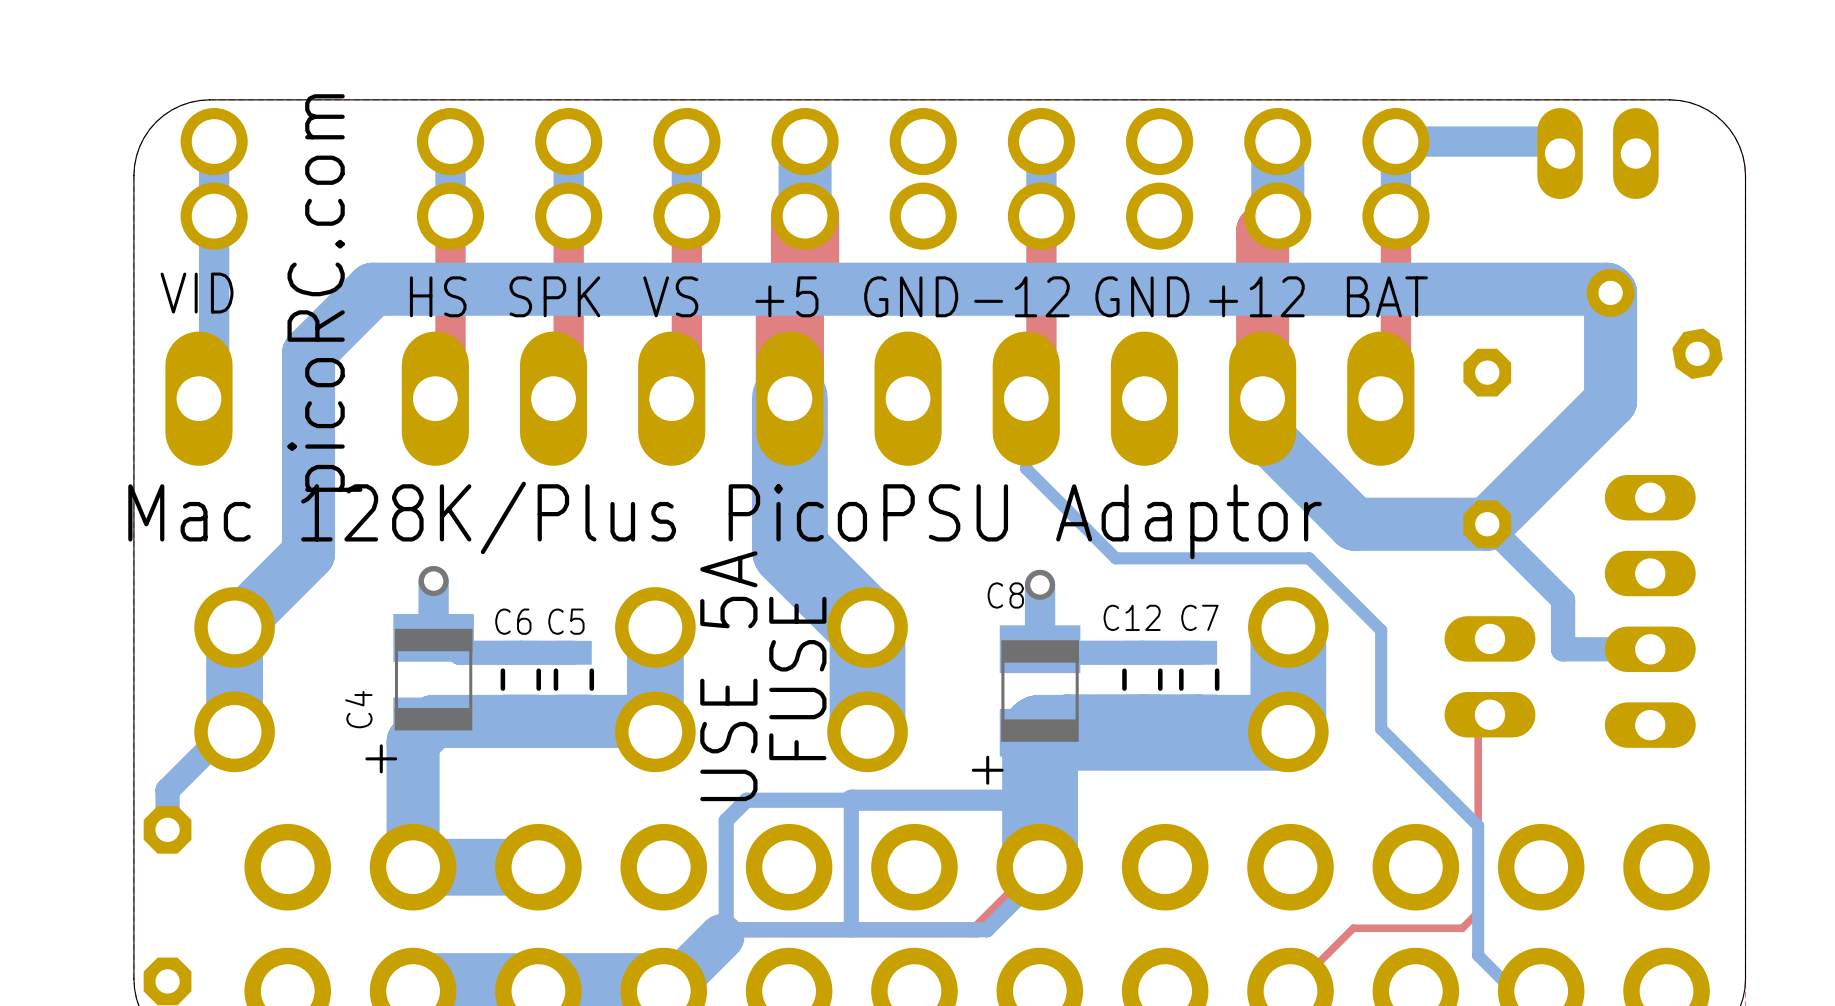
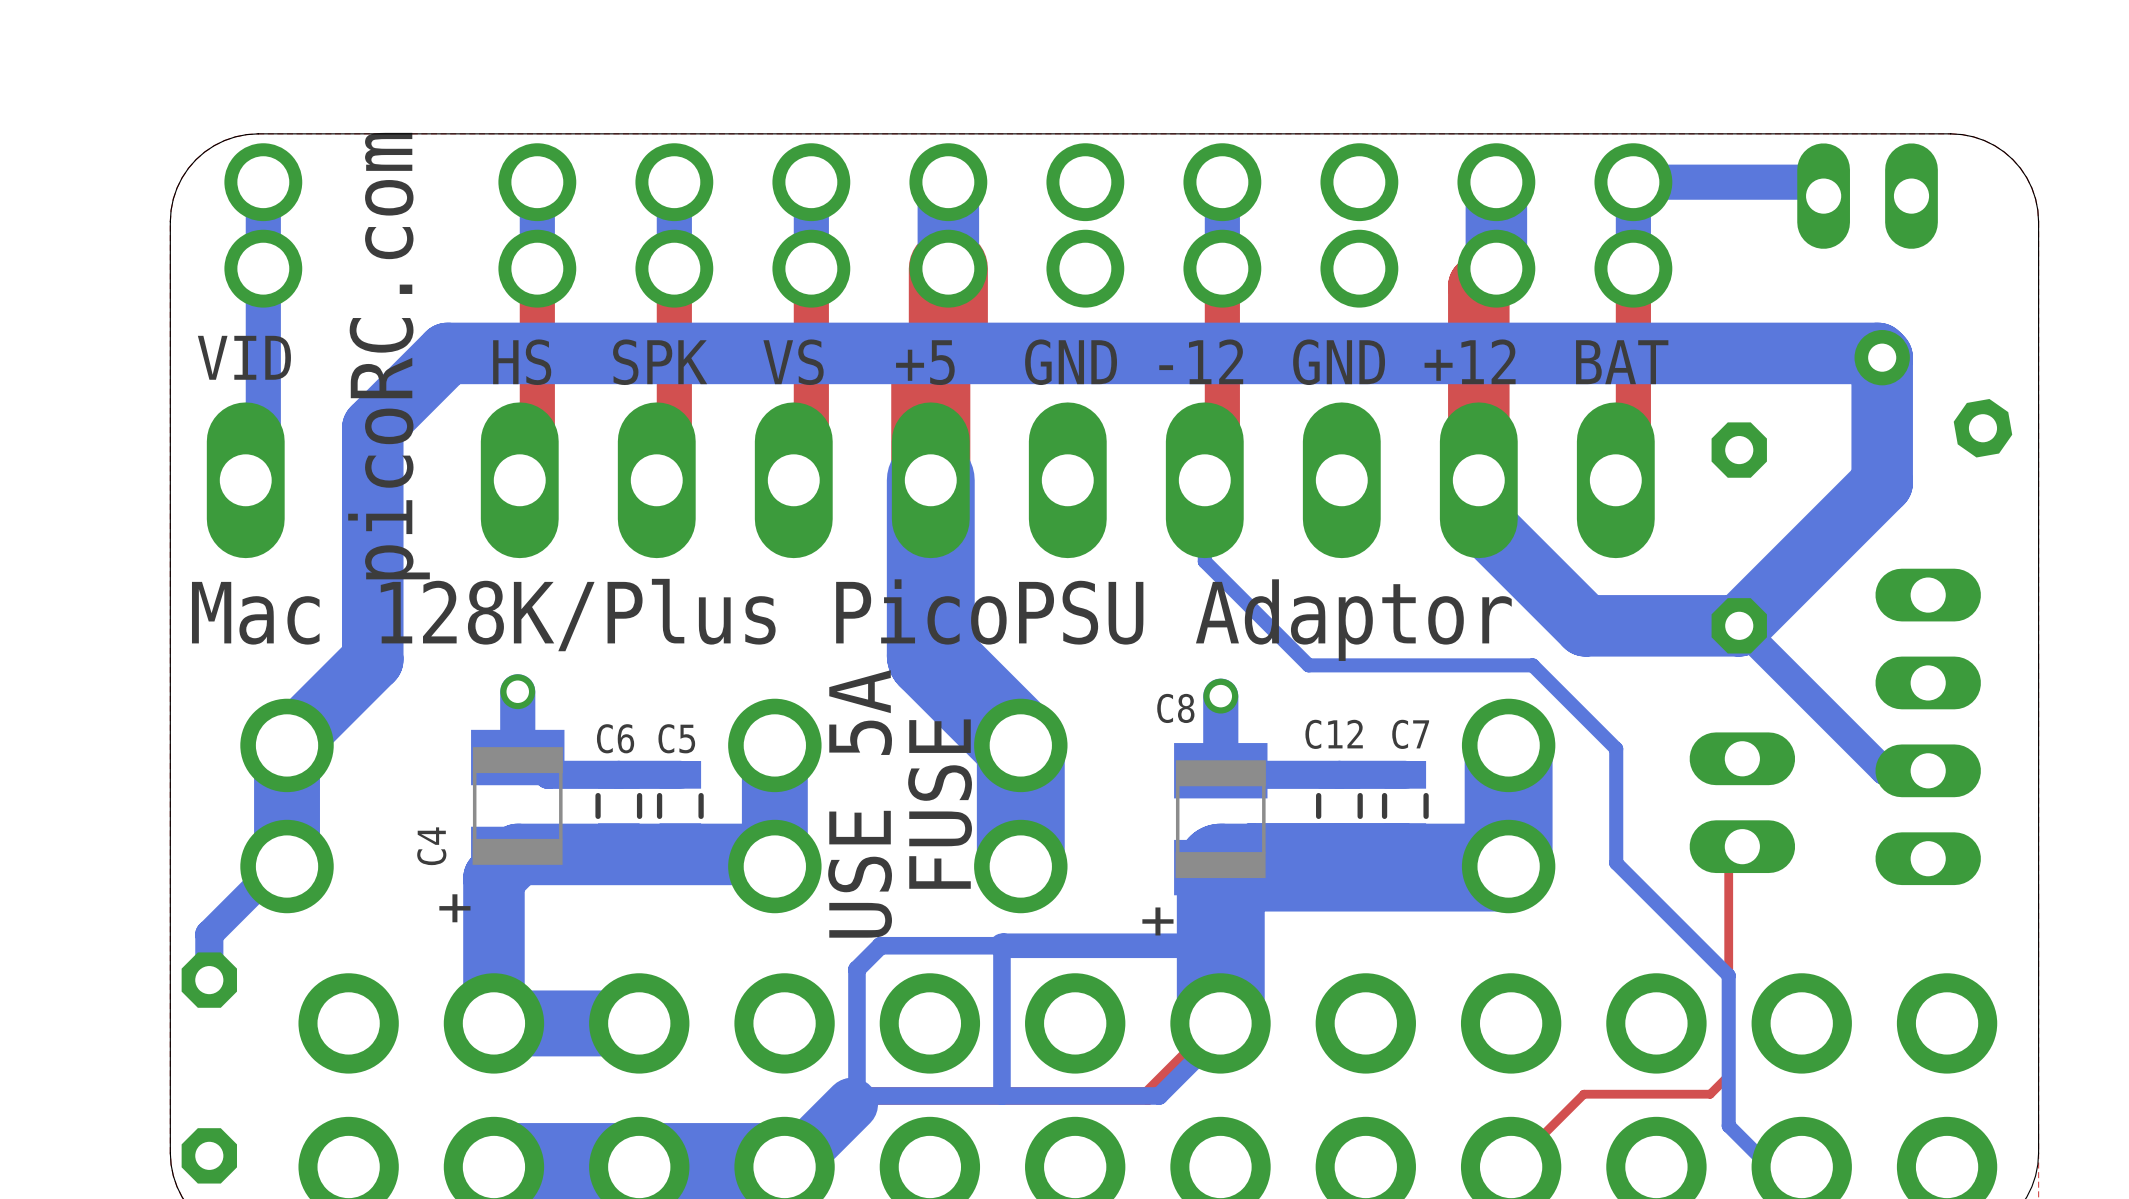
bottom track: (1563, 600) (1563, 649) (1612, 649) -> (1827, 713) (1884, 770)

